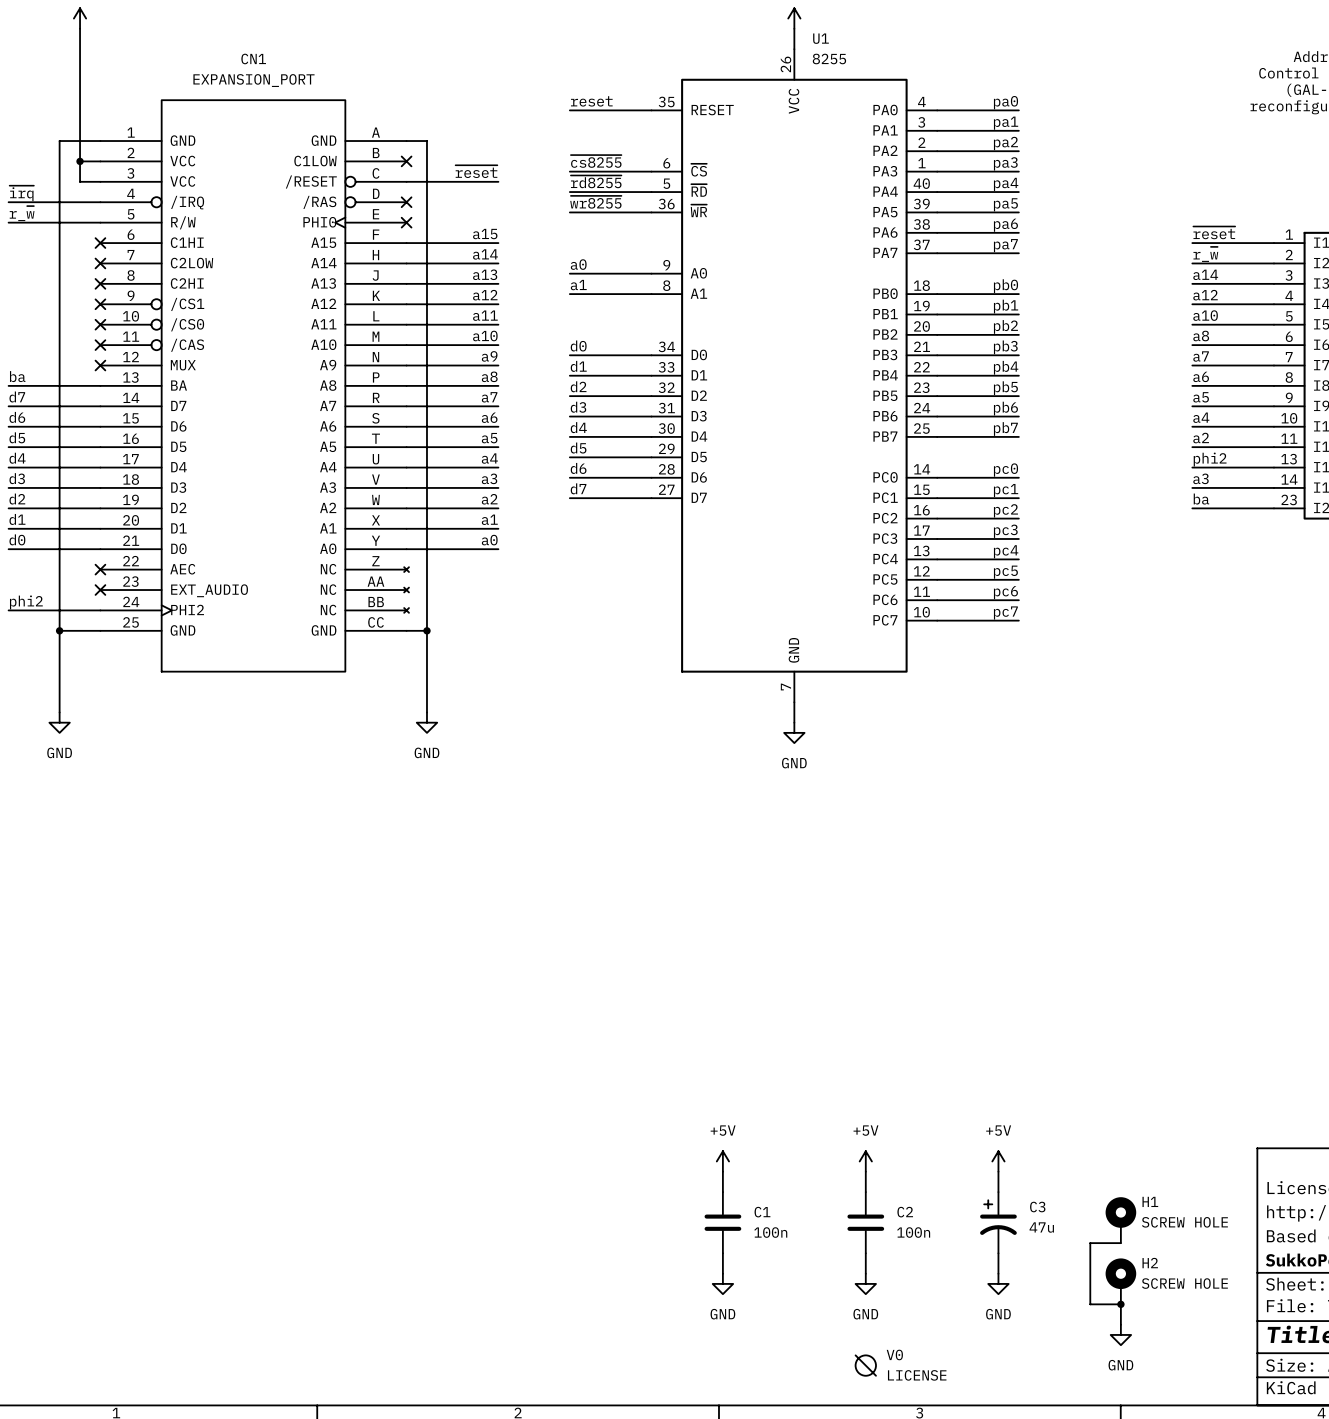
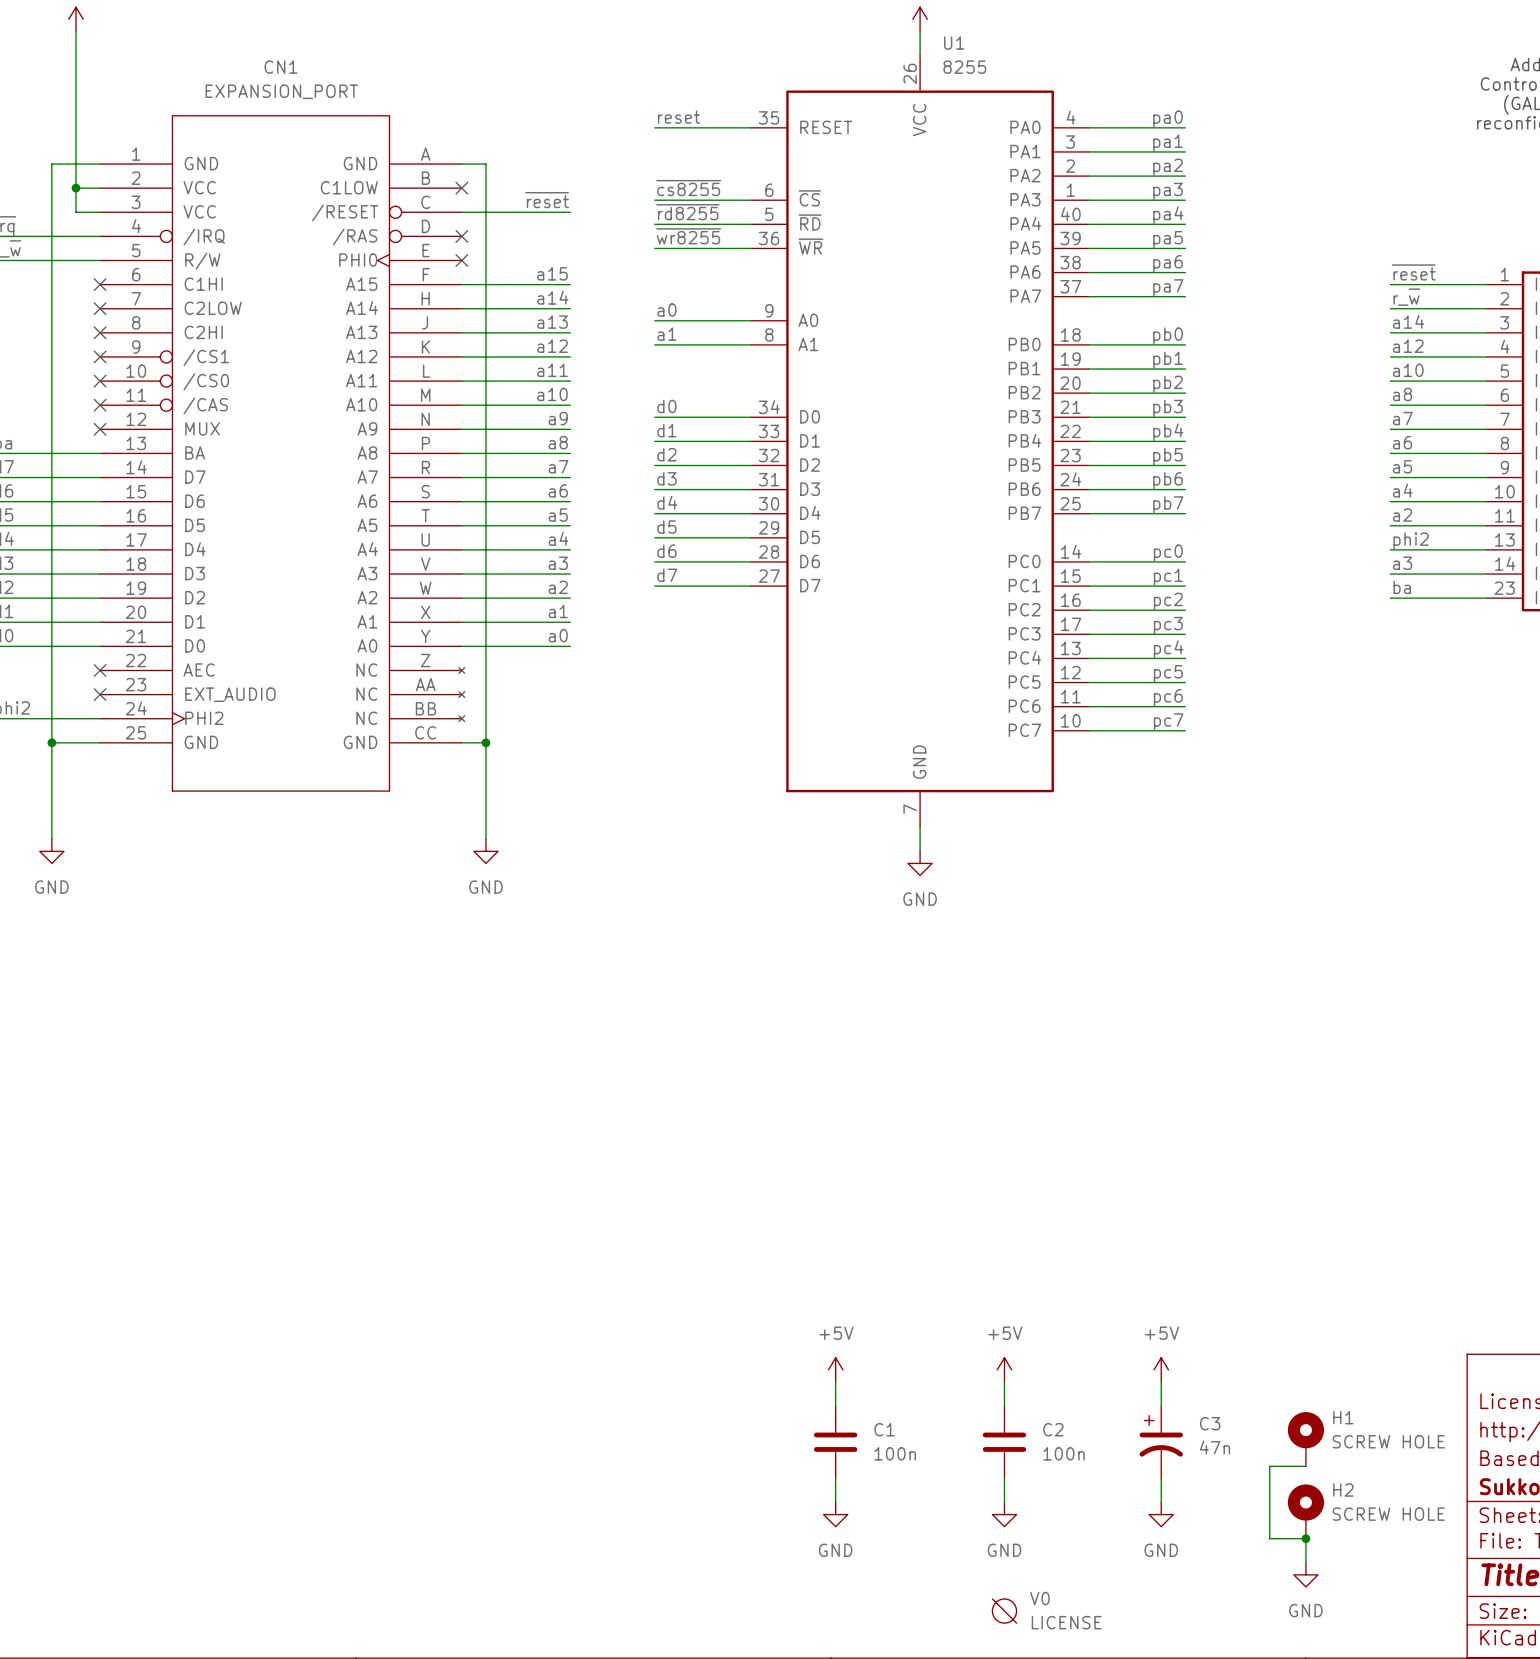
C3 value: 47u (1041, 1227) -> 47n (1215, 1447)

